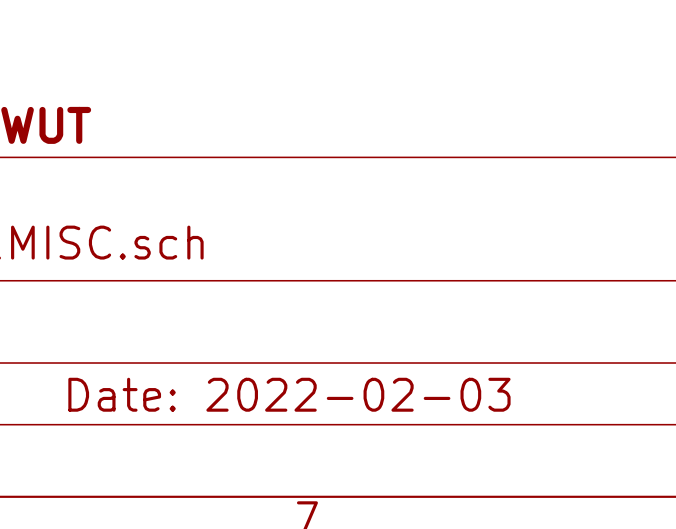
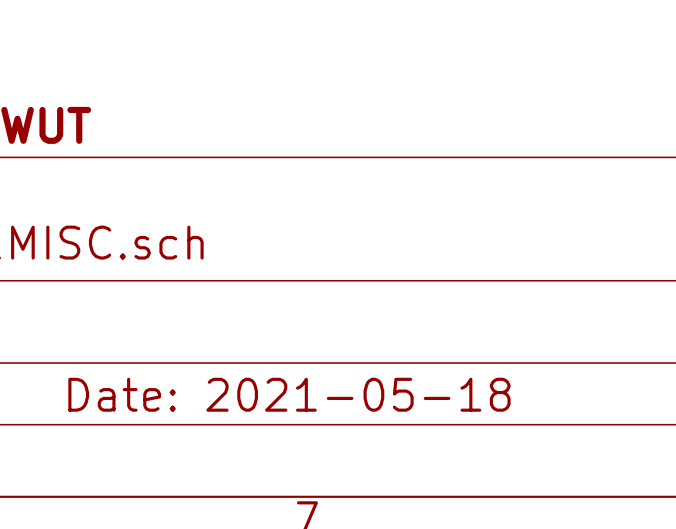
title block: Date: 2022-02-03 (289, 394) -> Date: 2021-05-18 (289, 394)

